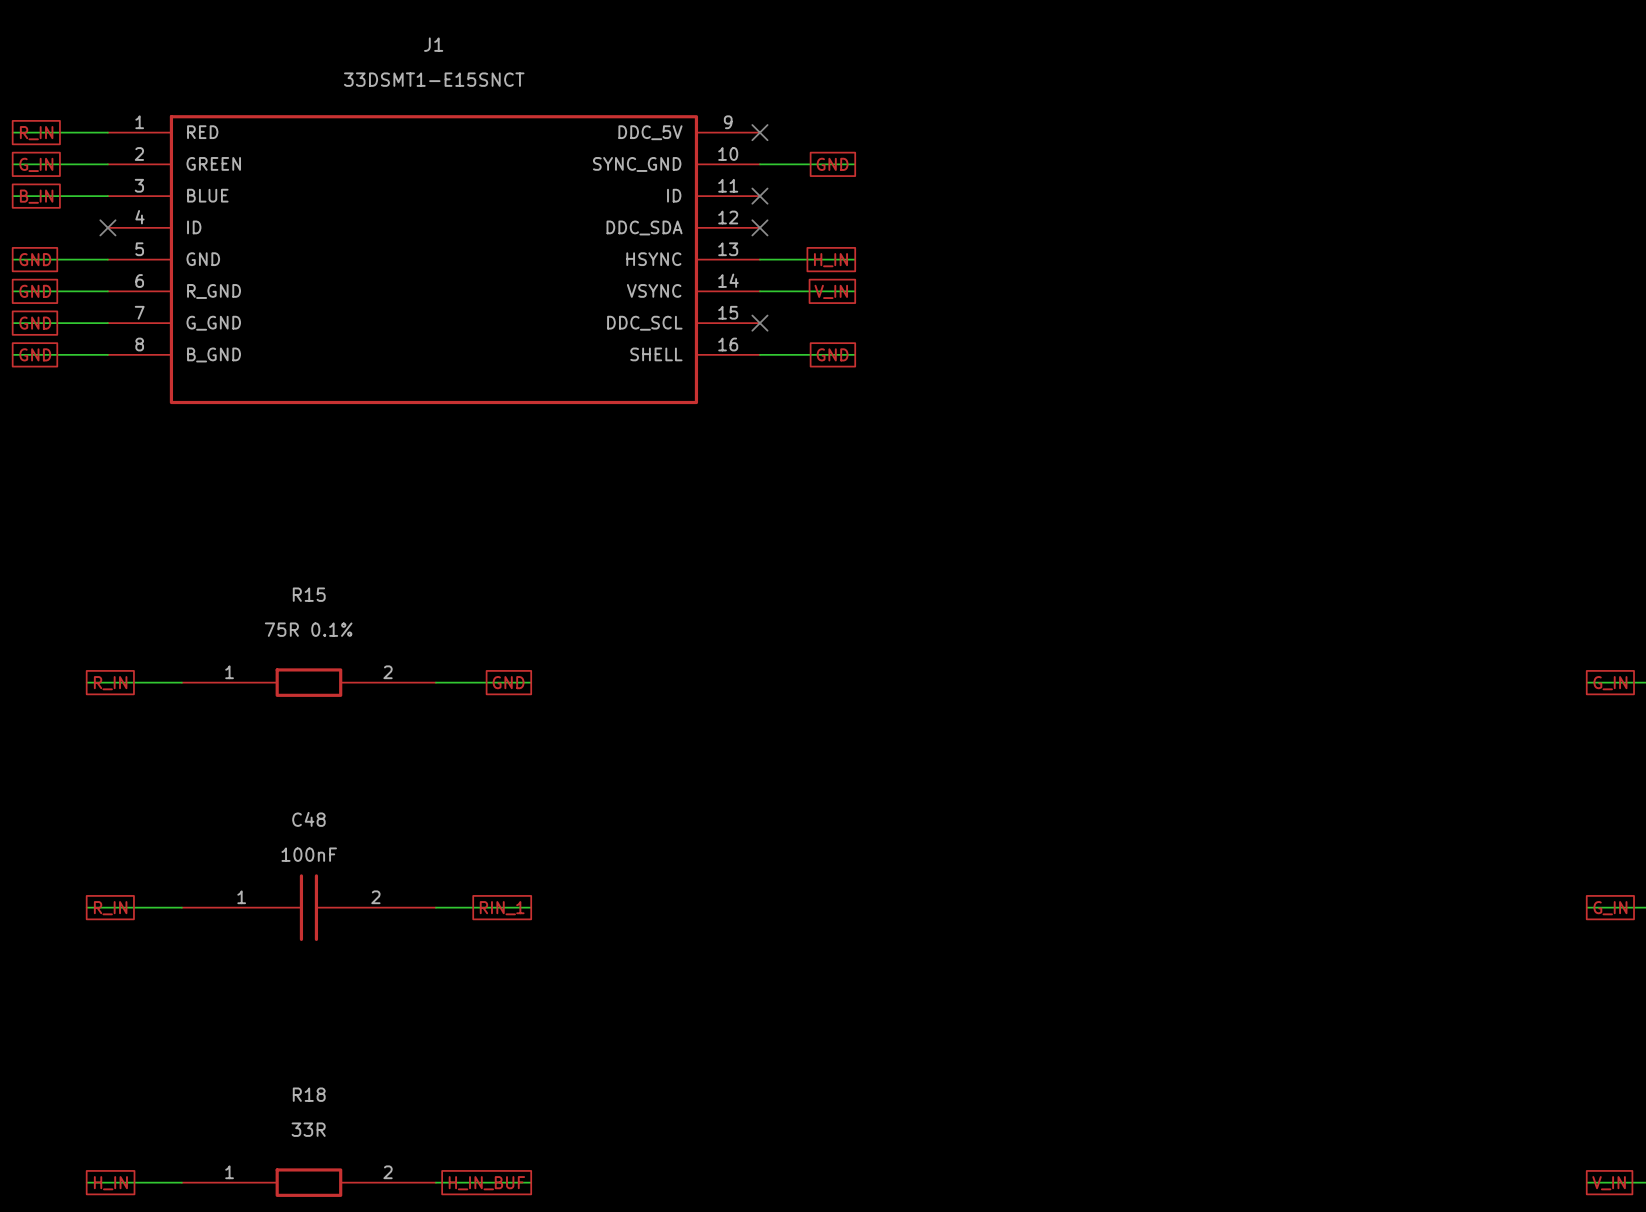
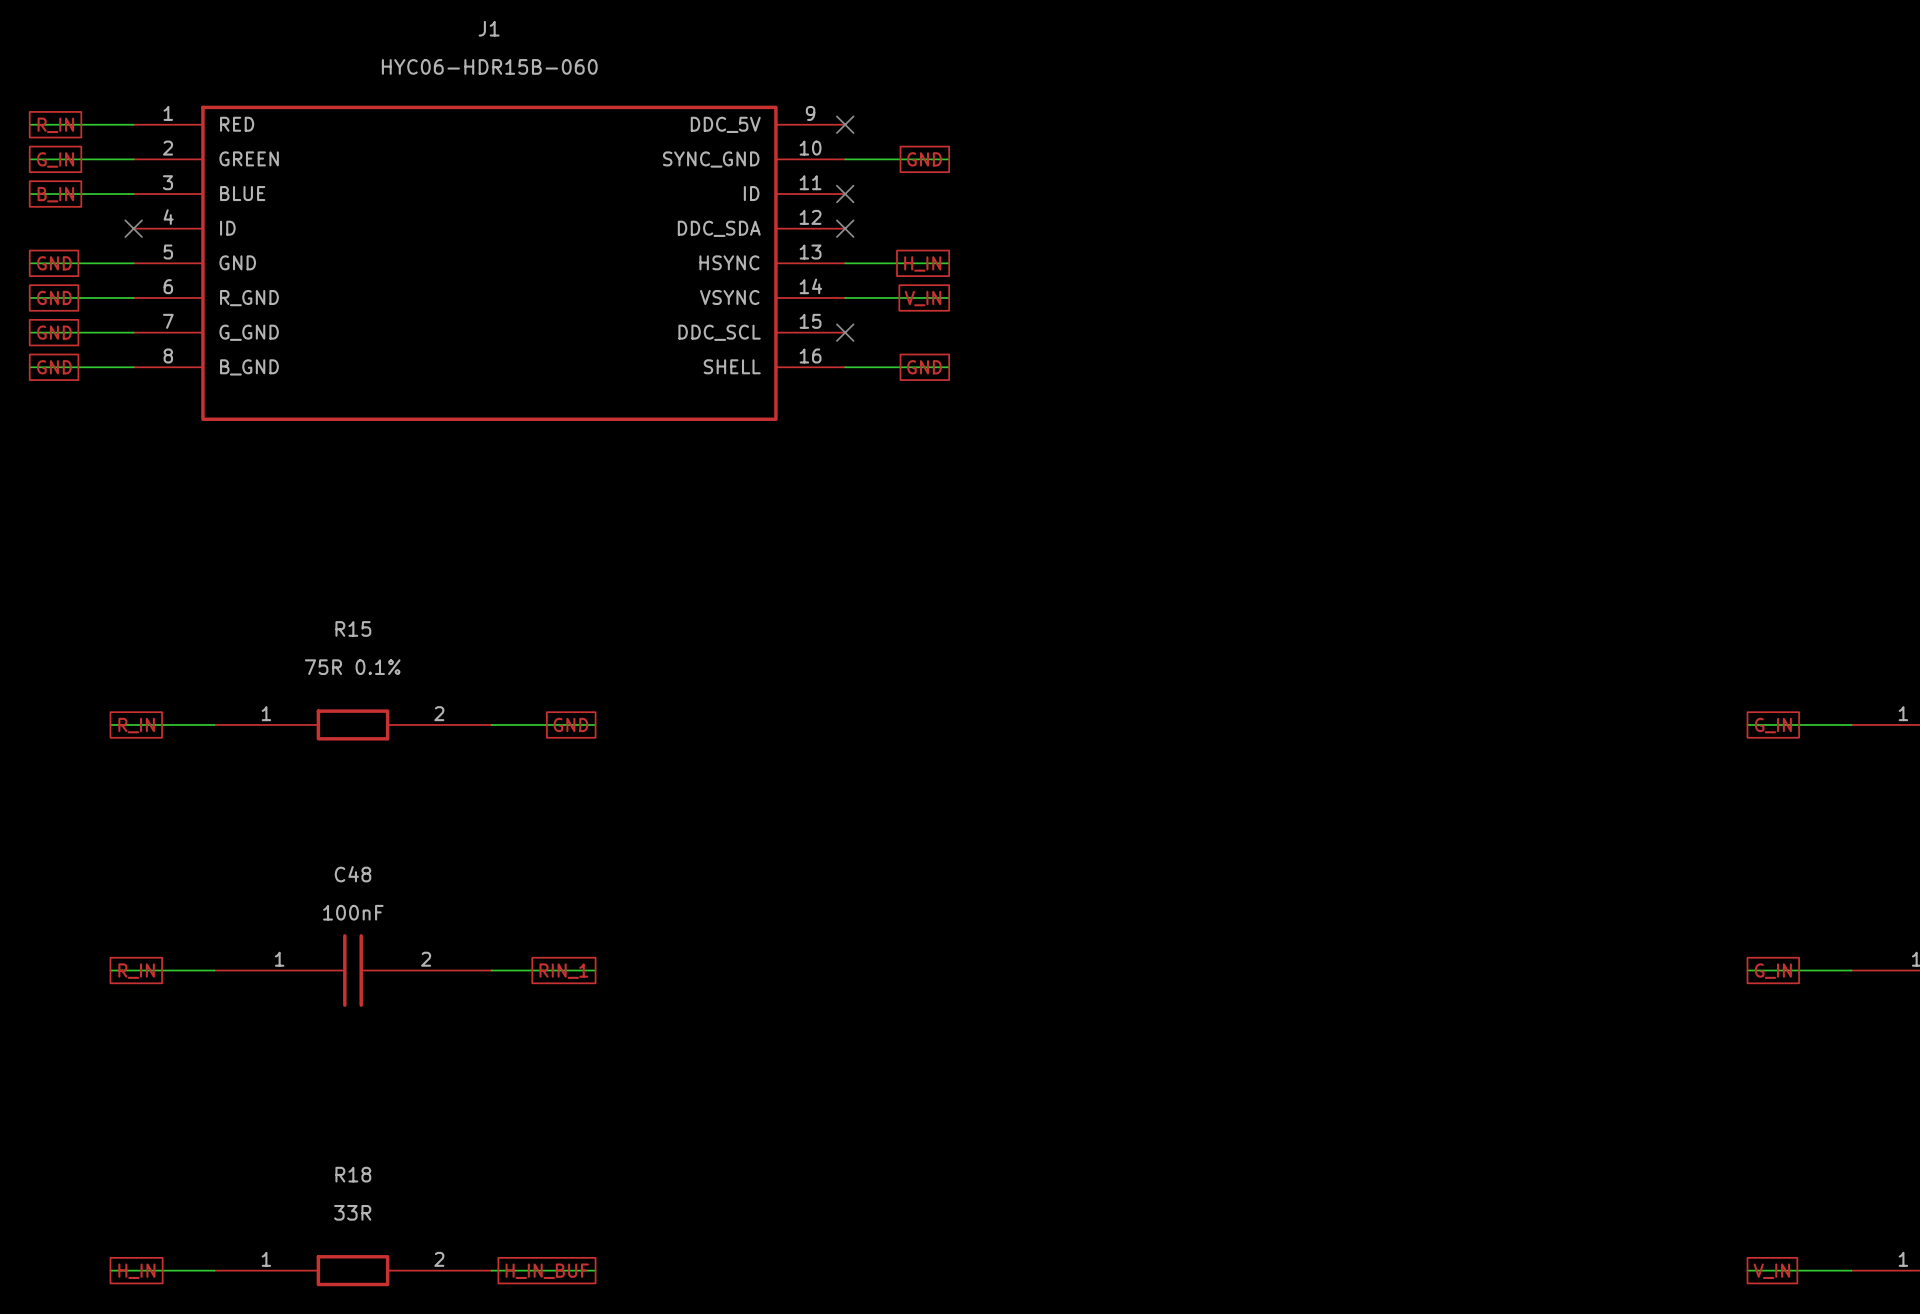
J1 value: 33DSMT1-E15SNCT (434, 79) -> HYC06-HDR15B-060 (489, 66)

